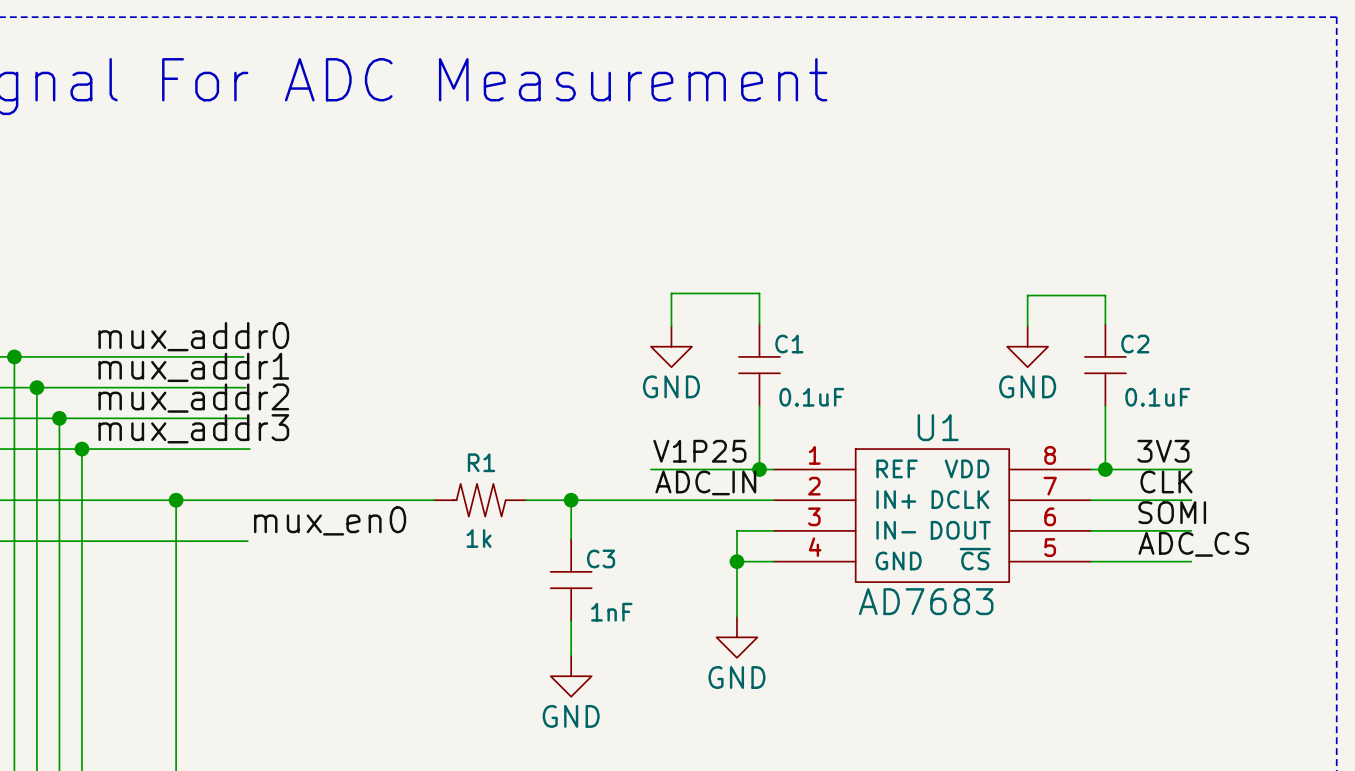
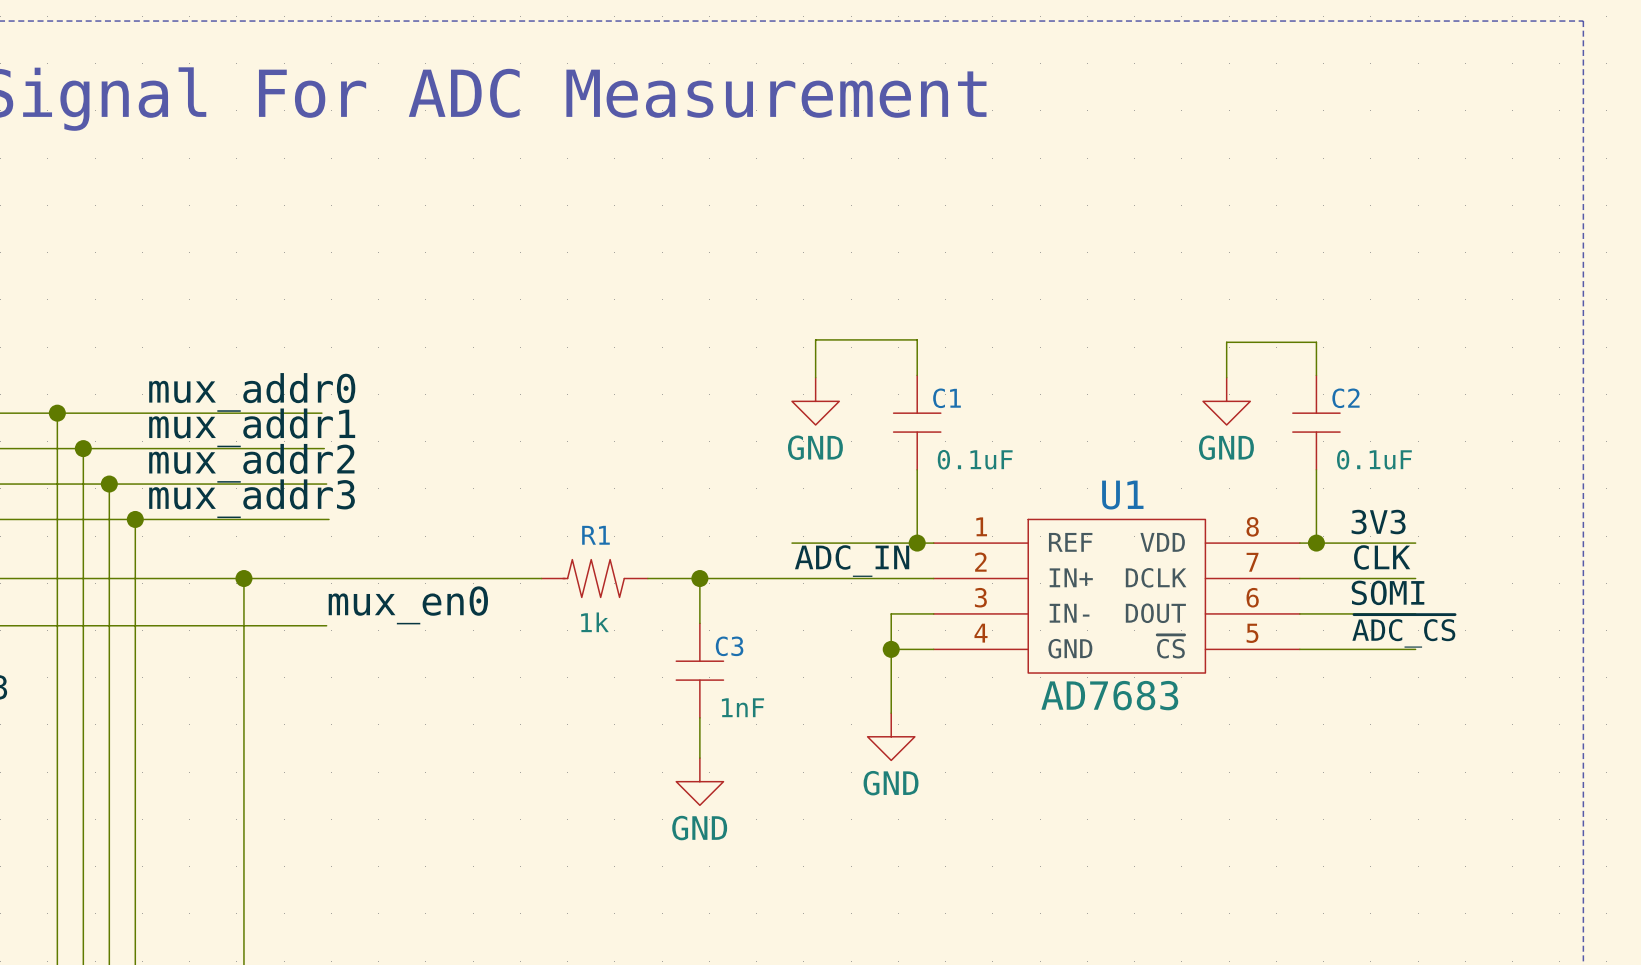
label: V1P25 (699, 451) -> none
label: ADC_CS (1193, 544) -> ~{ADC_CS} (1403, 631)

